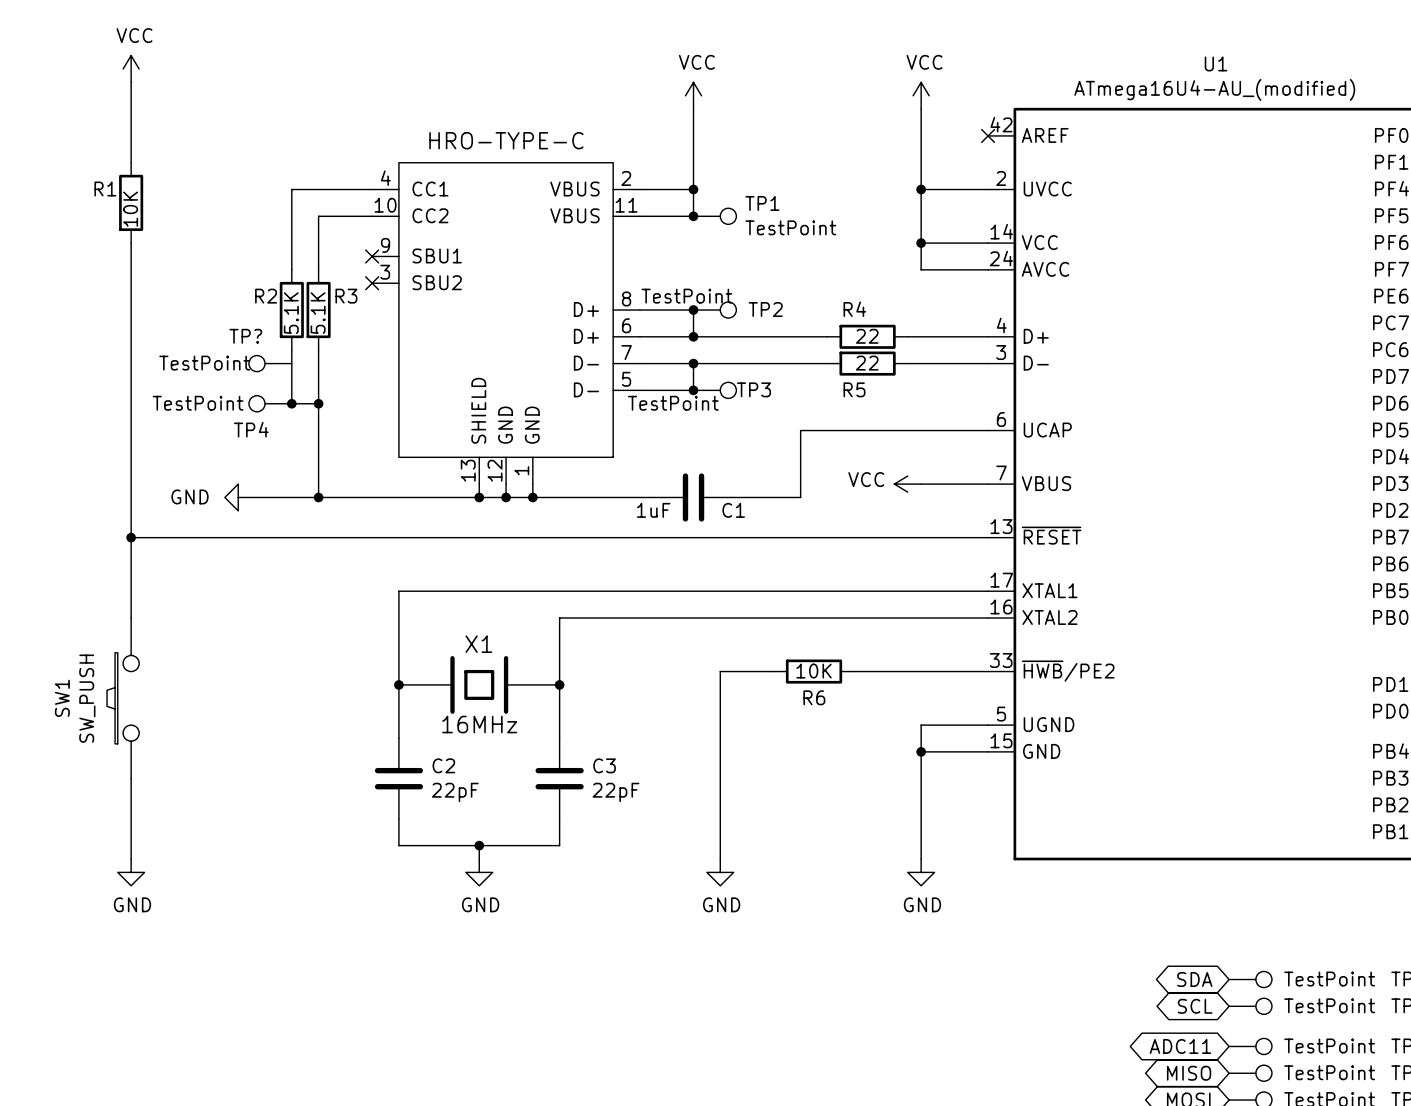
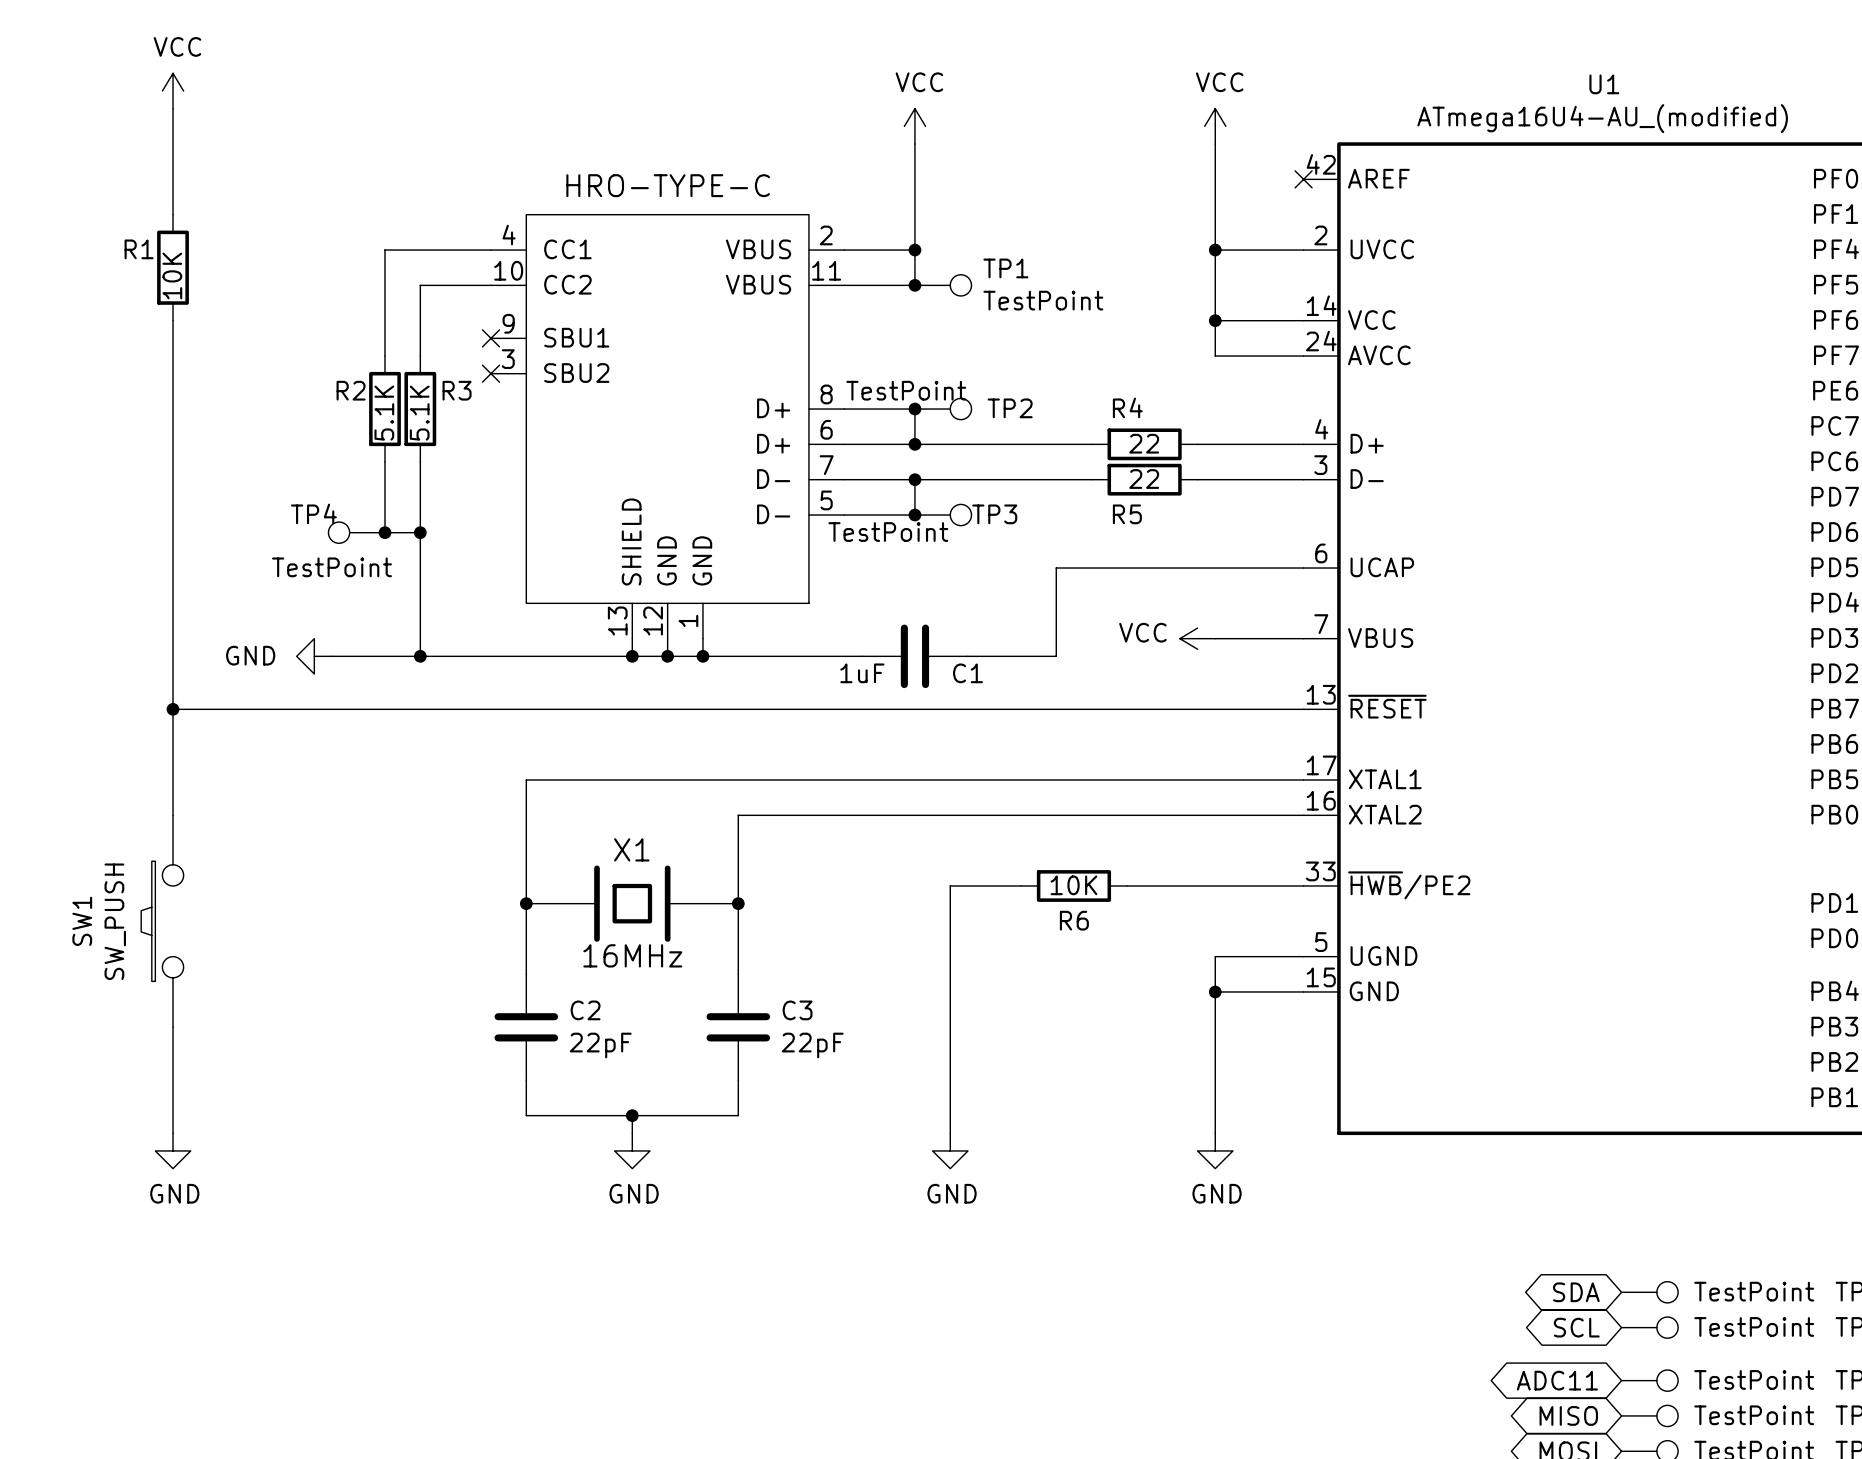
TP?: TestPoint (270, 363) -> none
TP4 value position: TestPoint (198, 403) -> TestPoint (332, 567)
TP4 name position: TP4 (251, 429) -> TP4 (313, 513)

